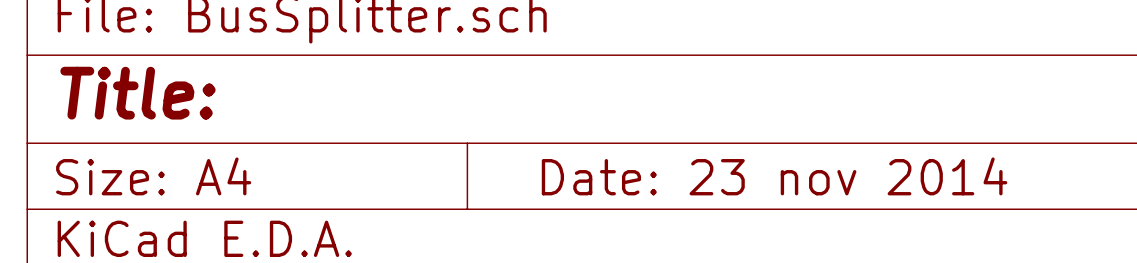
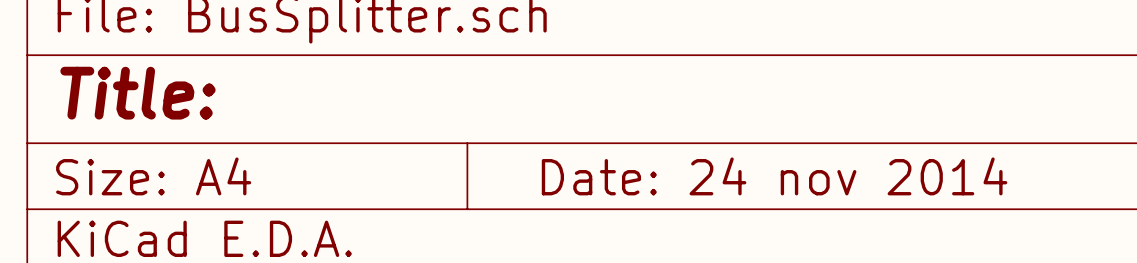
title block: Date: 23 nov 2014 (774, 176) -> Date: 24 nov 2014 (774, 176)

